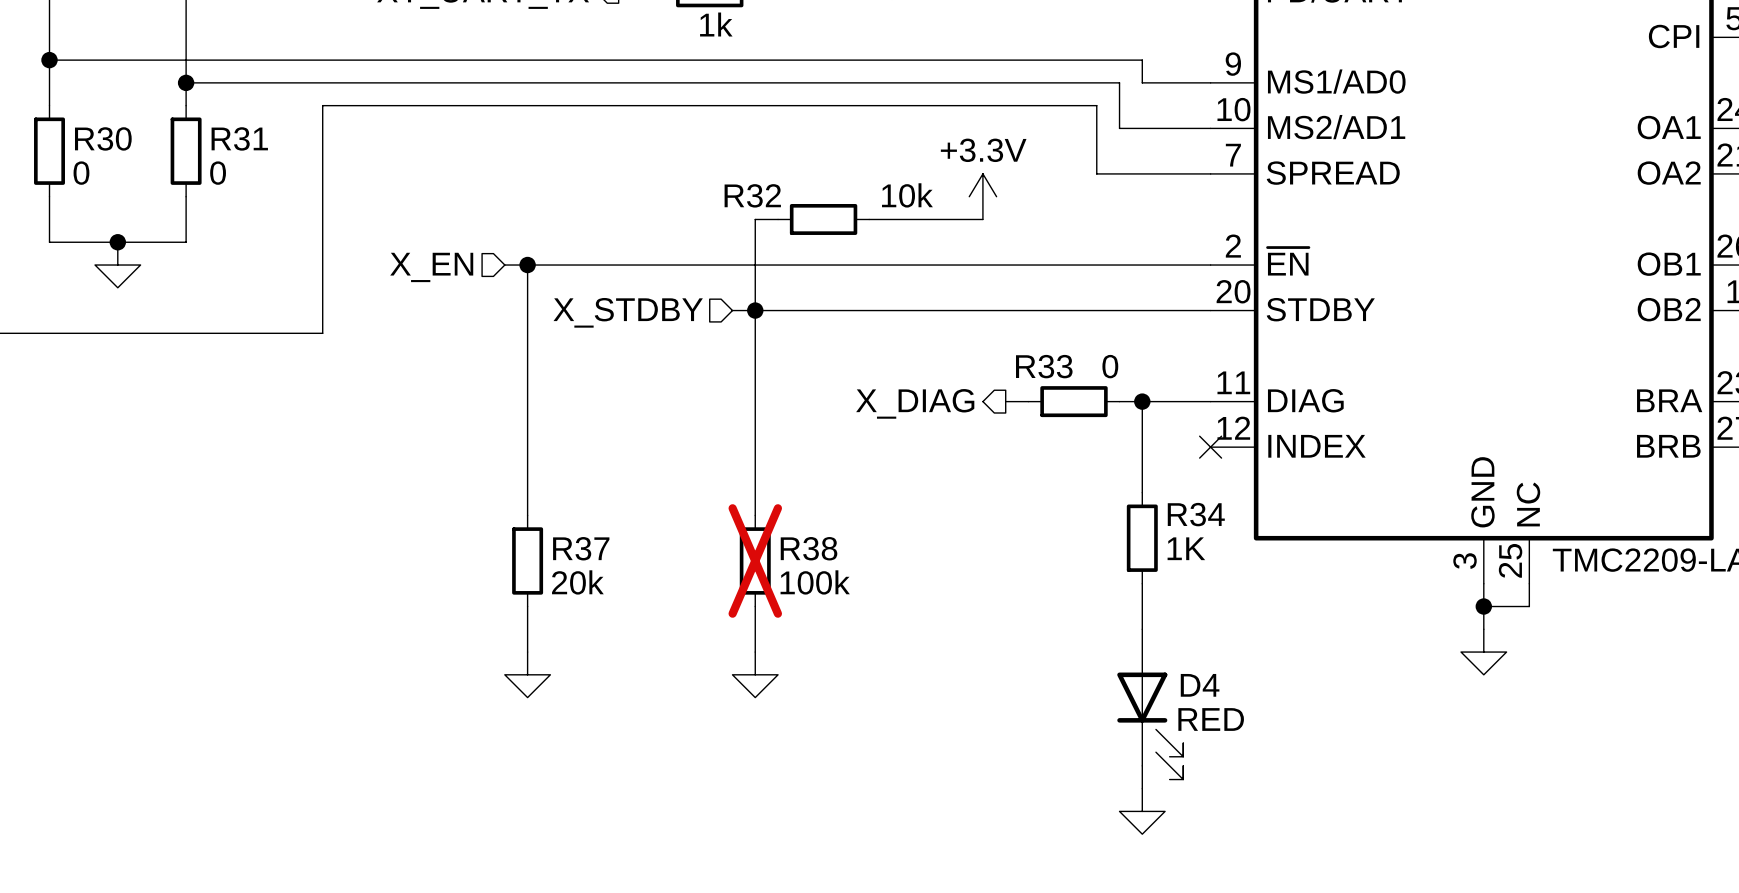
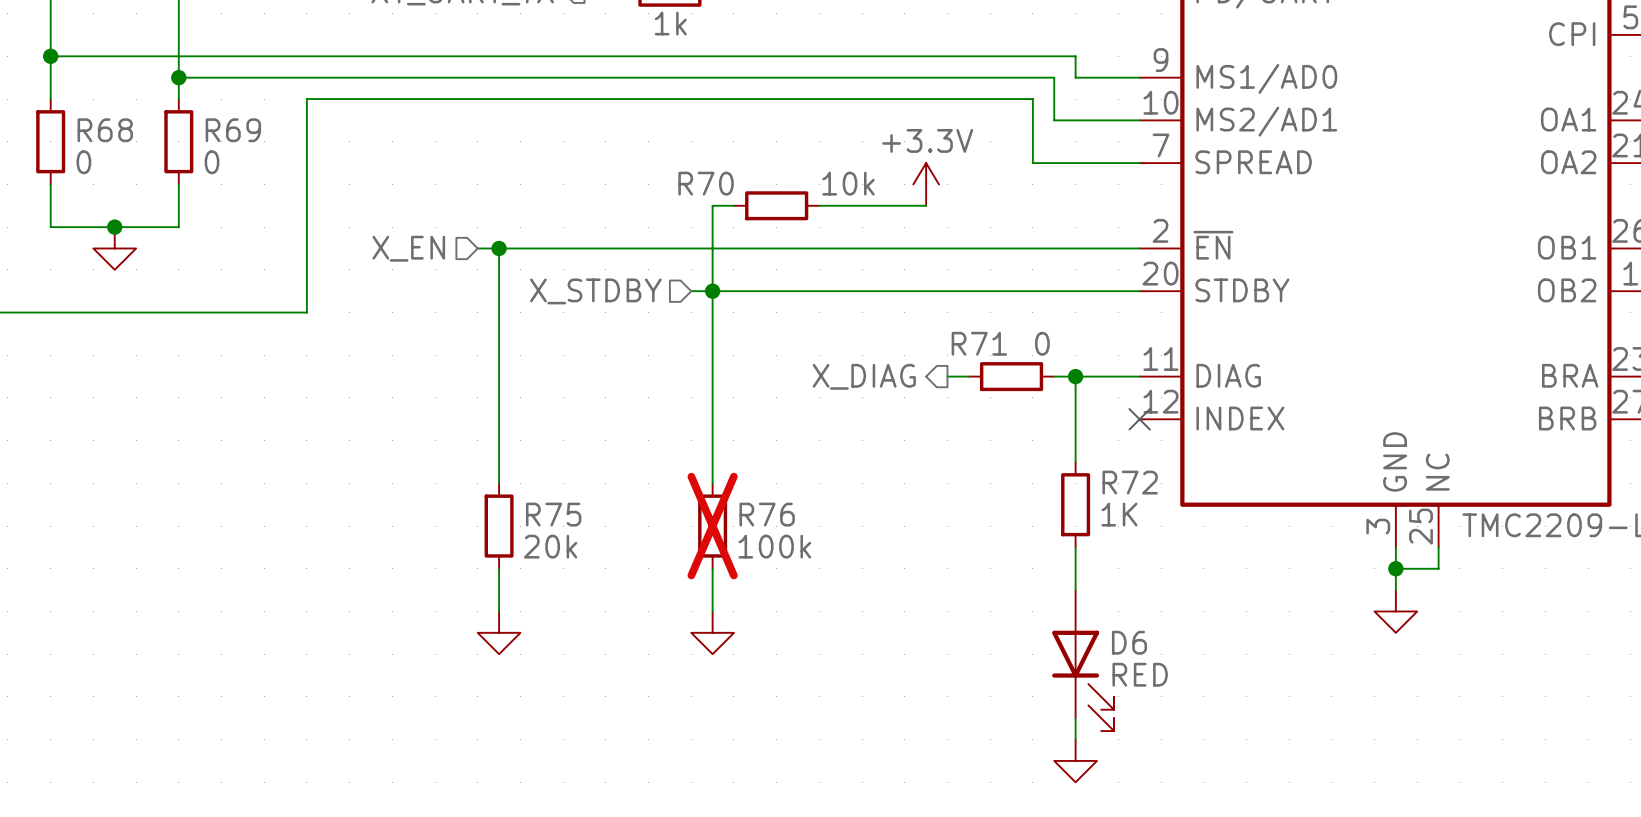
R30 name: R30 (103, 138) -> R68 (105, 130)
R31 name: R31 (239, 138) -> R69 (233, 130)
R32 name: R32 (752, 195) -> R70 (706, 183)
R33 name: R33 (1044, 366) -> R71 (979, 343)
R34 name: R34 (1196, 514) -> R72 (1130, 482)
R37 name: R37 (581, 548) -> R75 (553, 514)
R38 name: R38 (809, 548) -> R76 (767, 514)
D4 name: D4 (1200, 685) -> D6 (1129, 642)

